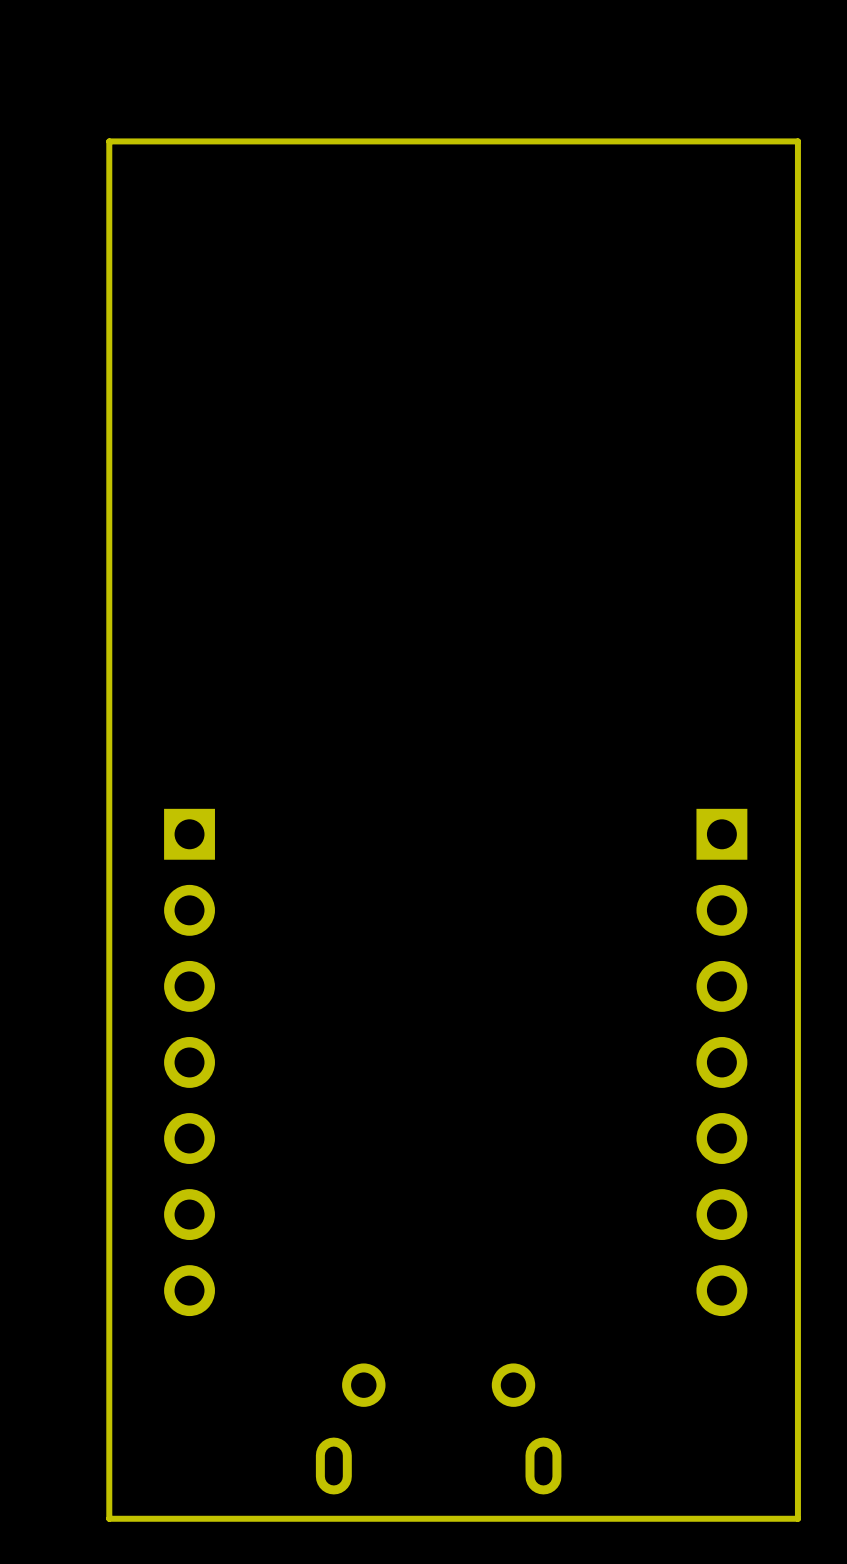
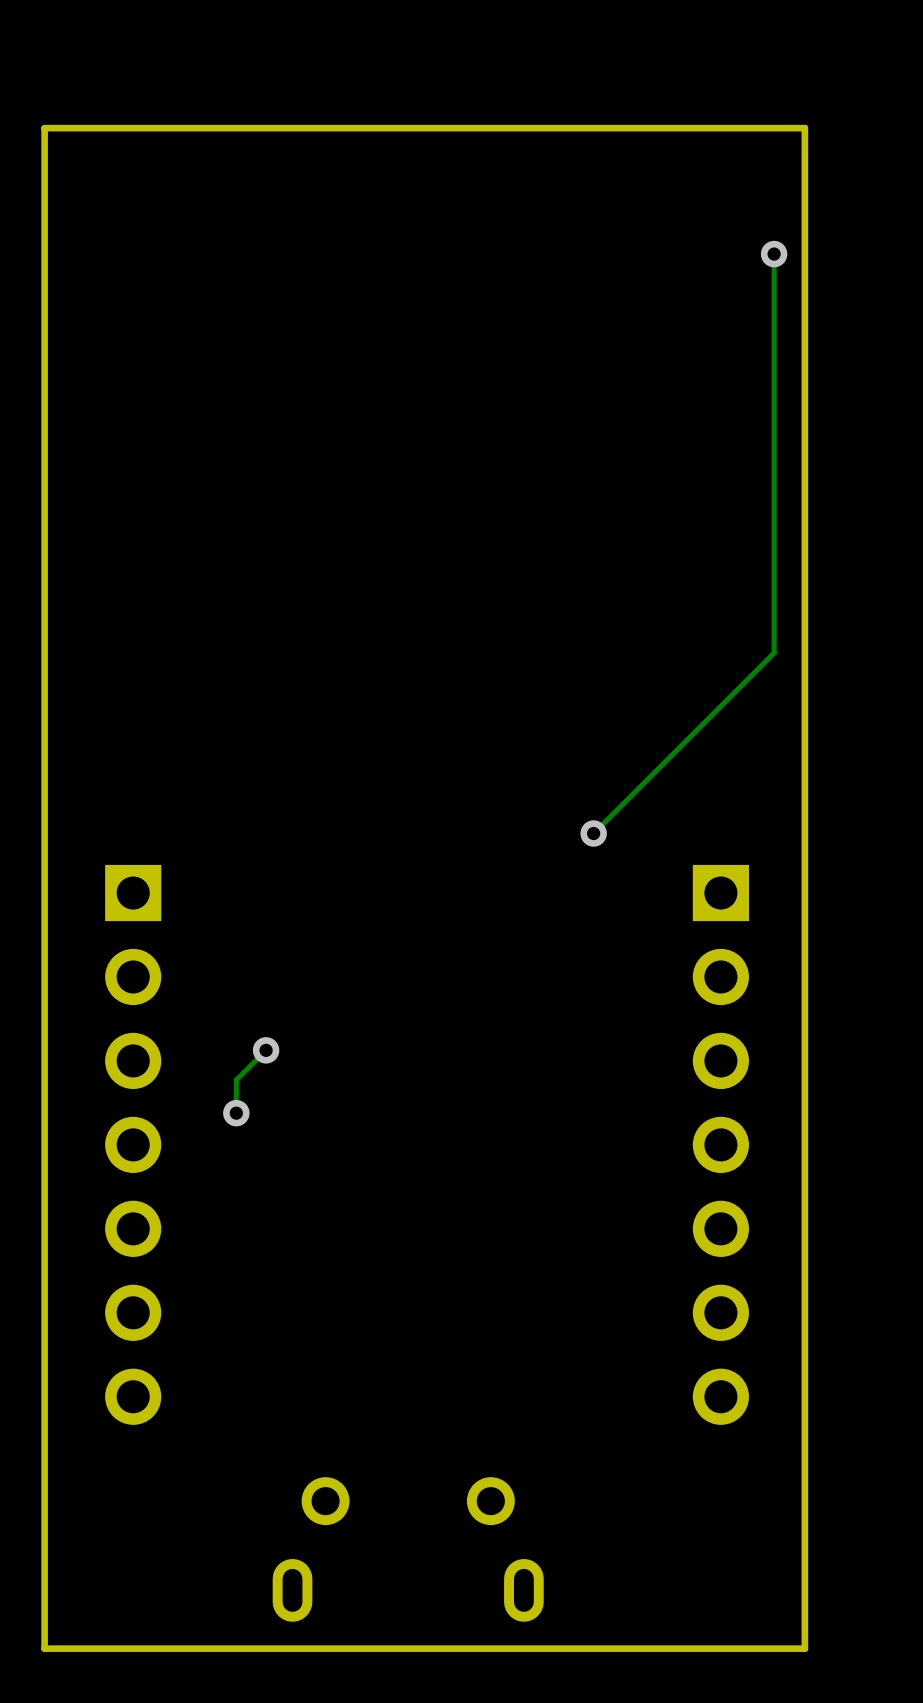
track: none -> (774, 254) (774, 653) (593, 833)
via: none -> (774, 254)
via: none -> (593, 833)
track: none -> (266, 1050) (236, 1080) (236, 1113)
via: none -> (266, 1050)
via: none -> (236, 1113)

